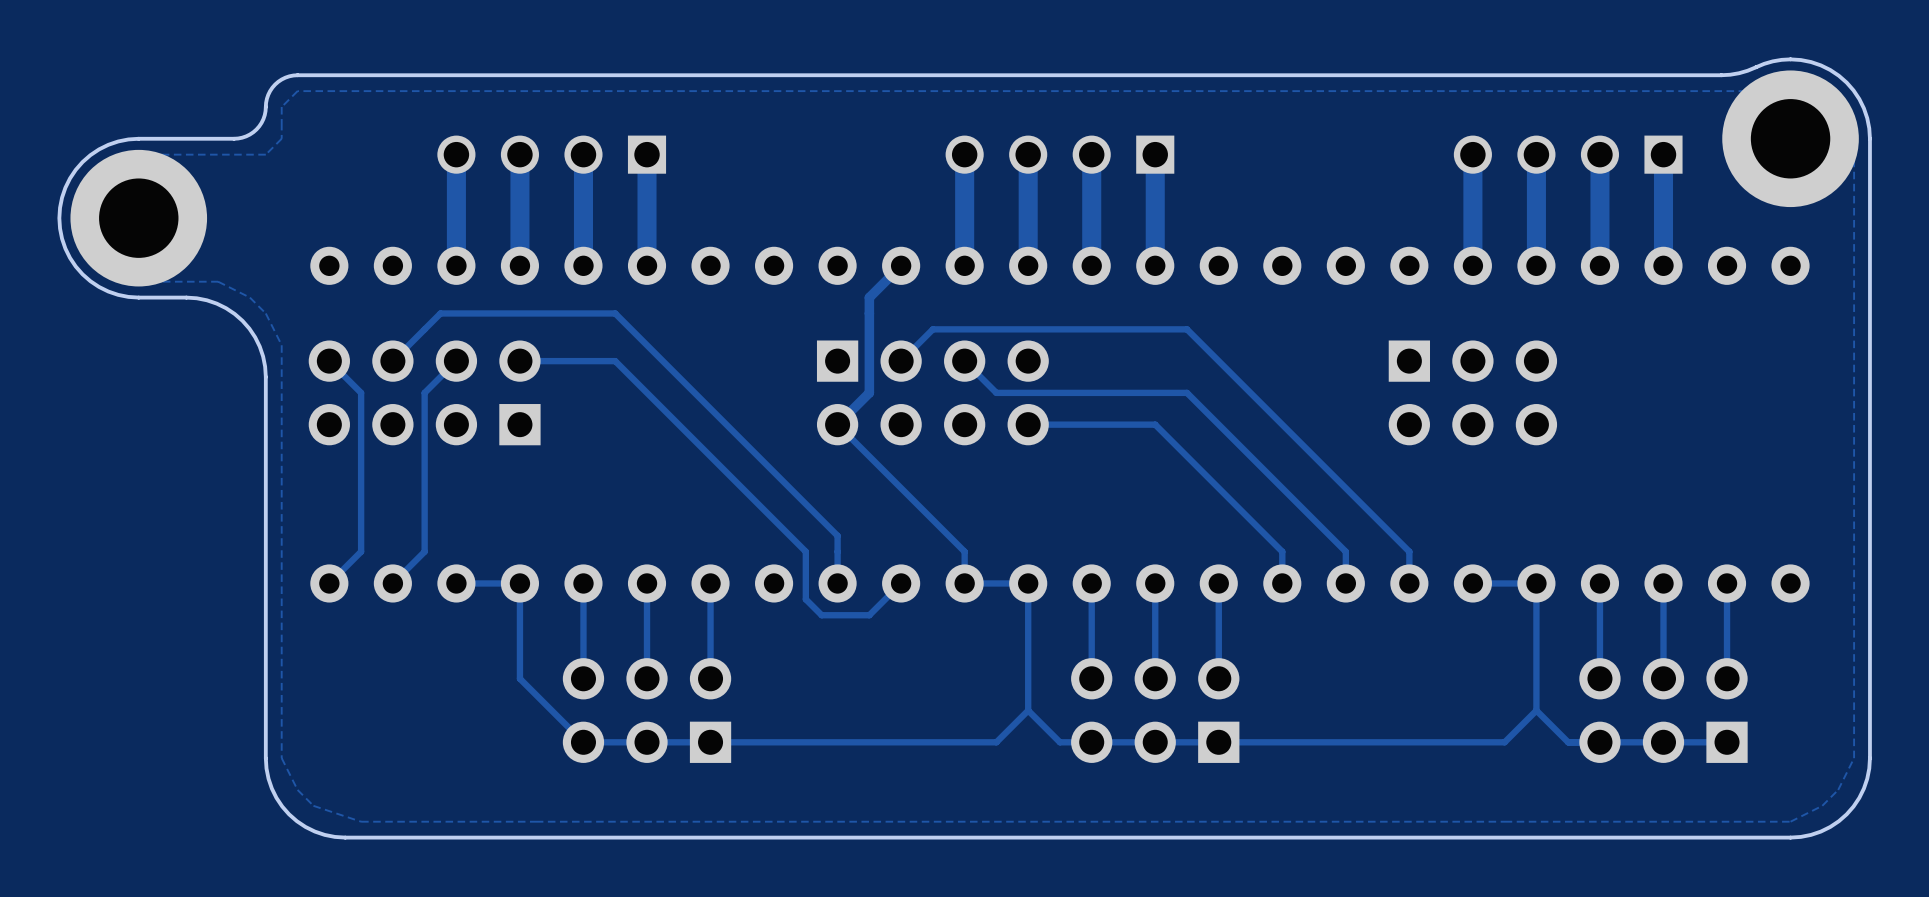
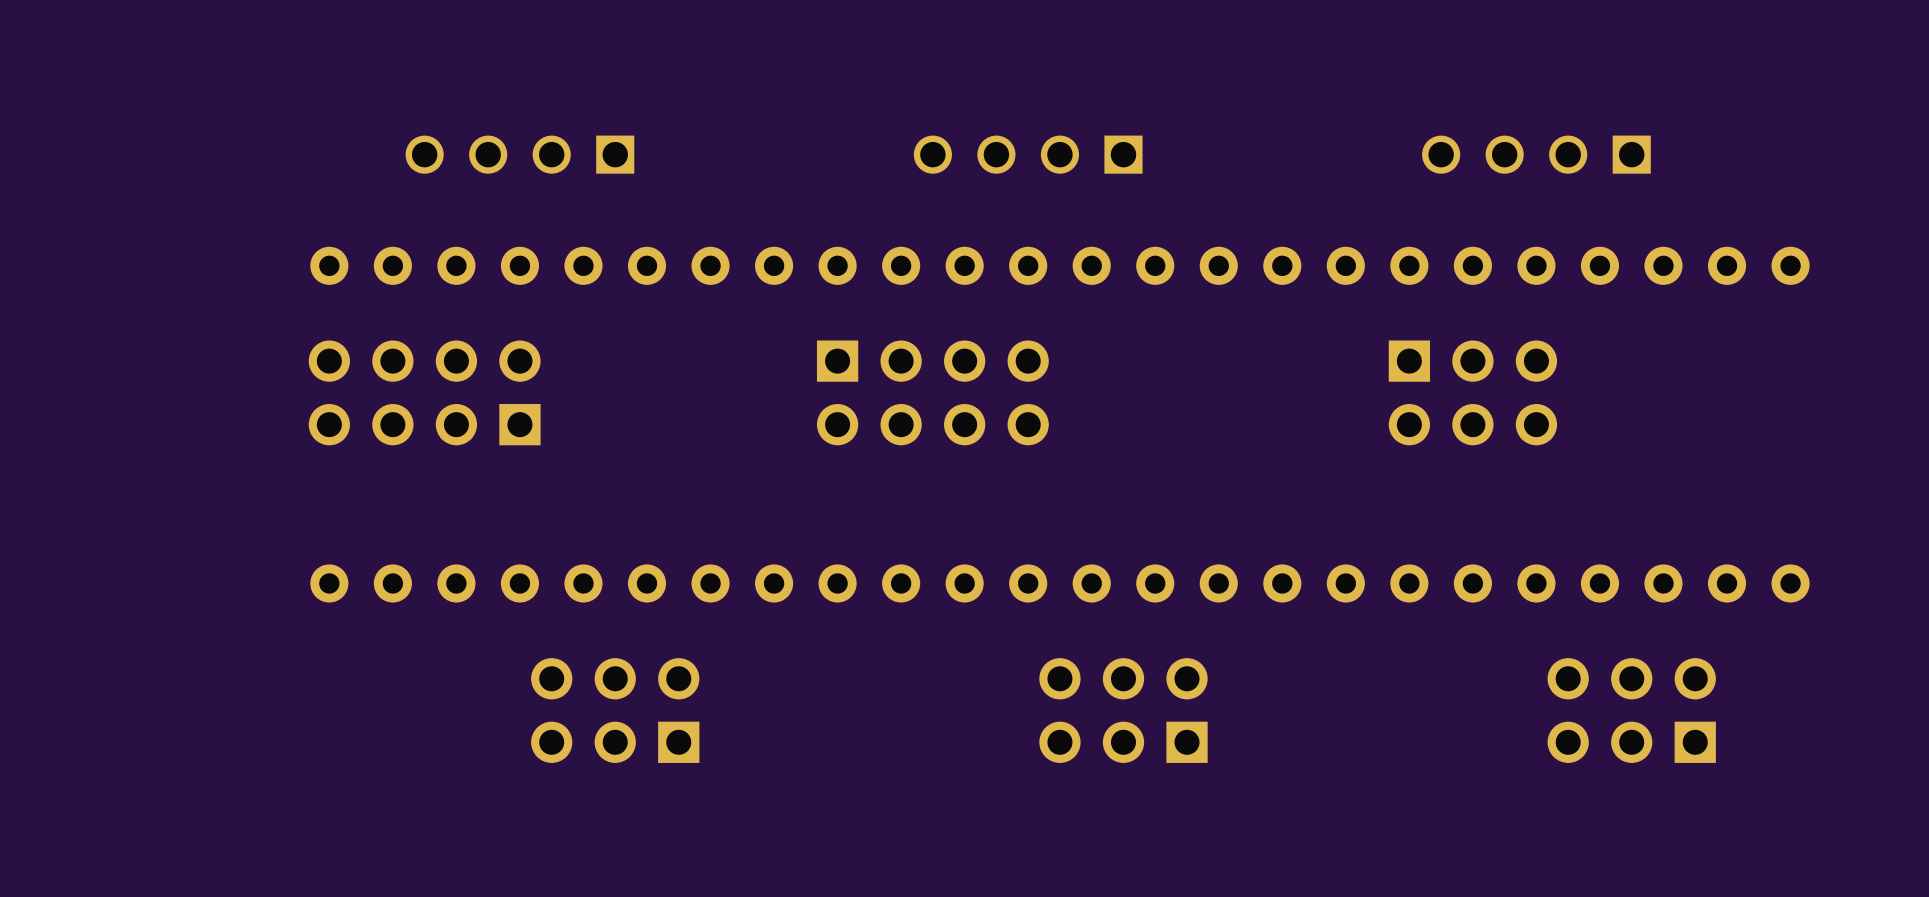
board edge: (1755, 67) (1772, 61) (1790, 59) (1811, 62) (1830, 69) (1846, 82) (1859, 99) (1867, 118) (1869, 138) (1869, 768) (1863, 788) (1846, 814) (1820, 831) (1800, 836) (345, 837) (314, 831) (296, 821) (282, 806) (271, 788) (266, 768) (265, 377) (259, 346) (242, 320) (216, 303) (196, 298) (128, 296) (99, 286) (75, 266) (65, 248) (60, 228) (60, 207) (65, 187) (75, 169) (99, 149) (128, 139) (234, 138) (246, 136) (256, 129) (261, 122) (266, 98) (272, 87) (281, 79) (293, 75) (1721, 75) (1739, 73) (1755, 67) -> none
zone outline: (1806, 91) (1854, 138) (1854, 758) (1838, 789) (1822, 805) (1790, 821) (361, 821) (313, 805) (297, 789) (281, 758) (281, 345) (265, 313) (249, 297) (218, 281) (138, 281) (75, 218) (138, 154) (265, 154) (281, 138) (281, 107) (297, 91) (1806, 91) -> none
part: (1790, 138) -> none
track: (456, 154) (456, 265) -> none
track: (519, 154) (519, 265) -> none
part position: (551, 154) -> (519, 154)
track: (583, 154) (583, 265) -> none
track: (647, 154) (647, 265) -> none
track: (964, 154) (964, 265) -> none
track: (1028, 154) (1028, 265) -> none
part position: (1059, 154) -> (1028, 154)
track: (1091, 154) (1091, 265) -> none
track: (1155, 154) (1155, 265) -> none
track: (1472, 154) (1472, 265) -> none
track: (1536, 154) (1536, 265) -> none
part position: (1568, 154) -> (1536, 154)
track: (1599, 154) (1599, 265) -> none
track: (1663, 154) (1663, 265) -> none
part: (138, 218) -> none
track: (901, 265) (869, 297) (869, 392) (837, 424) (964, 551) (964, 583) (1028, 583) (1028, 710) -> none
track: (329, 361) (361, 392) (361, 551) (329, 583) -> none
track: (392, 361) (440, 313) (615, 313) (837, 535) (837, 583) -> none
track: (456, 361) (424, 392) (424, 551) (392, 583) -> none
track: (519, 361) (615, 361) (805, 551) (805, 599) (821, 615) (869, 615) (901, 583) -> none
track: (901, 361) (932, 329) (1187, 329) (1409, 551) (1409, 583) -> none
track: (964, 361) (996, 392) (1187, 392) (1345, 551) (1345, 583) -> none
track: (1028, 424) (1155, 424) (1282, 551) (1282, 583) -> none
track: (456, 583) (519, 583) (519, 678) (583, 742) (996, 742) (1028, 710) -> none
track: (583, 583) (583, 678) -> none
track: (647, 583) (647, 678) -> none
track: (710, 583) (710, 678) -> none
track: (1091, 583) (1091, 678) -> none
track: (1155, 583) (1155, 678) -> none
track: (1218, 583) (1218, 678) -> none
track: (1472, 583) (1536, 583) (1536, 710) -> none
track: (1599, 583) (1599, 678) -> none
track: (1663, 583) (1663, 678) -> none
track: (1727, 583) (1727, 678) -> none
part position: (647, 710) -> (615, 710)
part position: (1155, 710) -> (1123, 710)
track: (1536, 710) (1504, 742) (1059, 742) (1028, 710) -> none
track: (1536, 710) (1568, 742) (1727, 742) -> none
part position: (1663, 710) -> (1631, 710)

